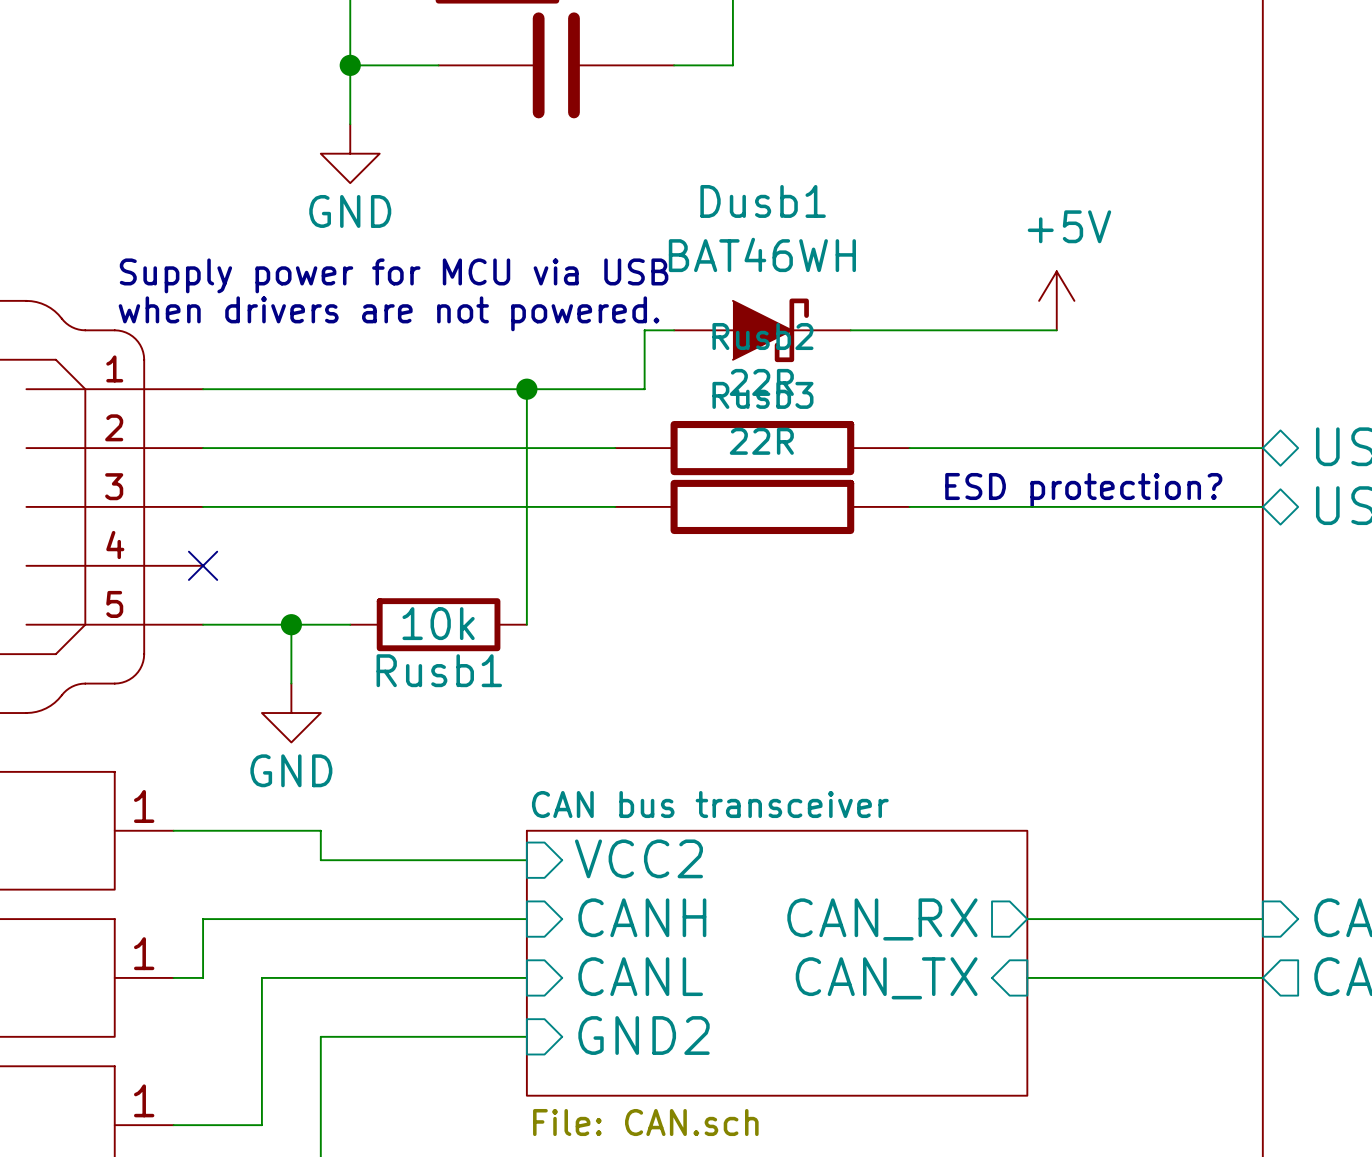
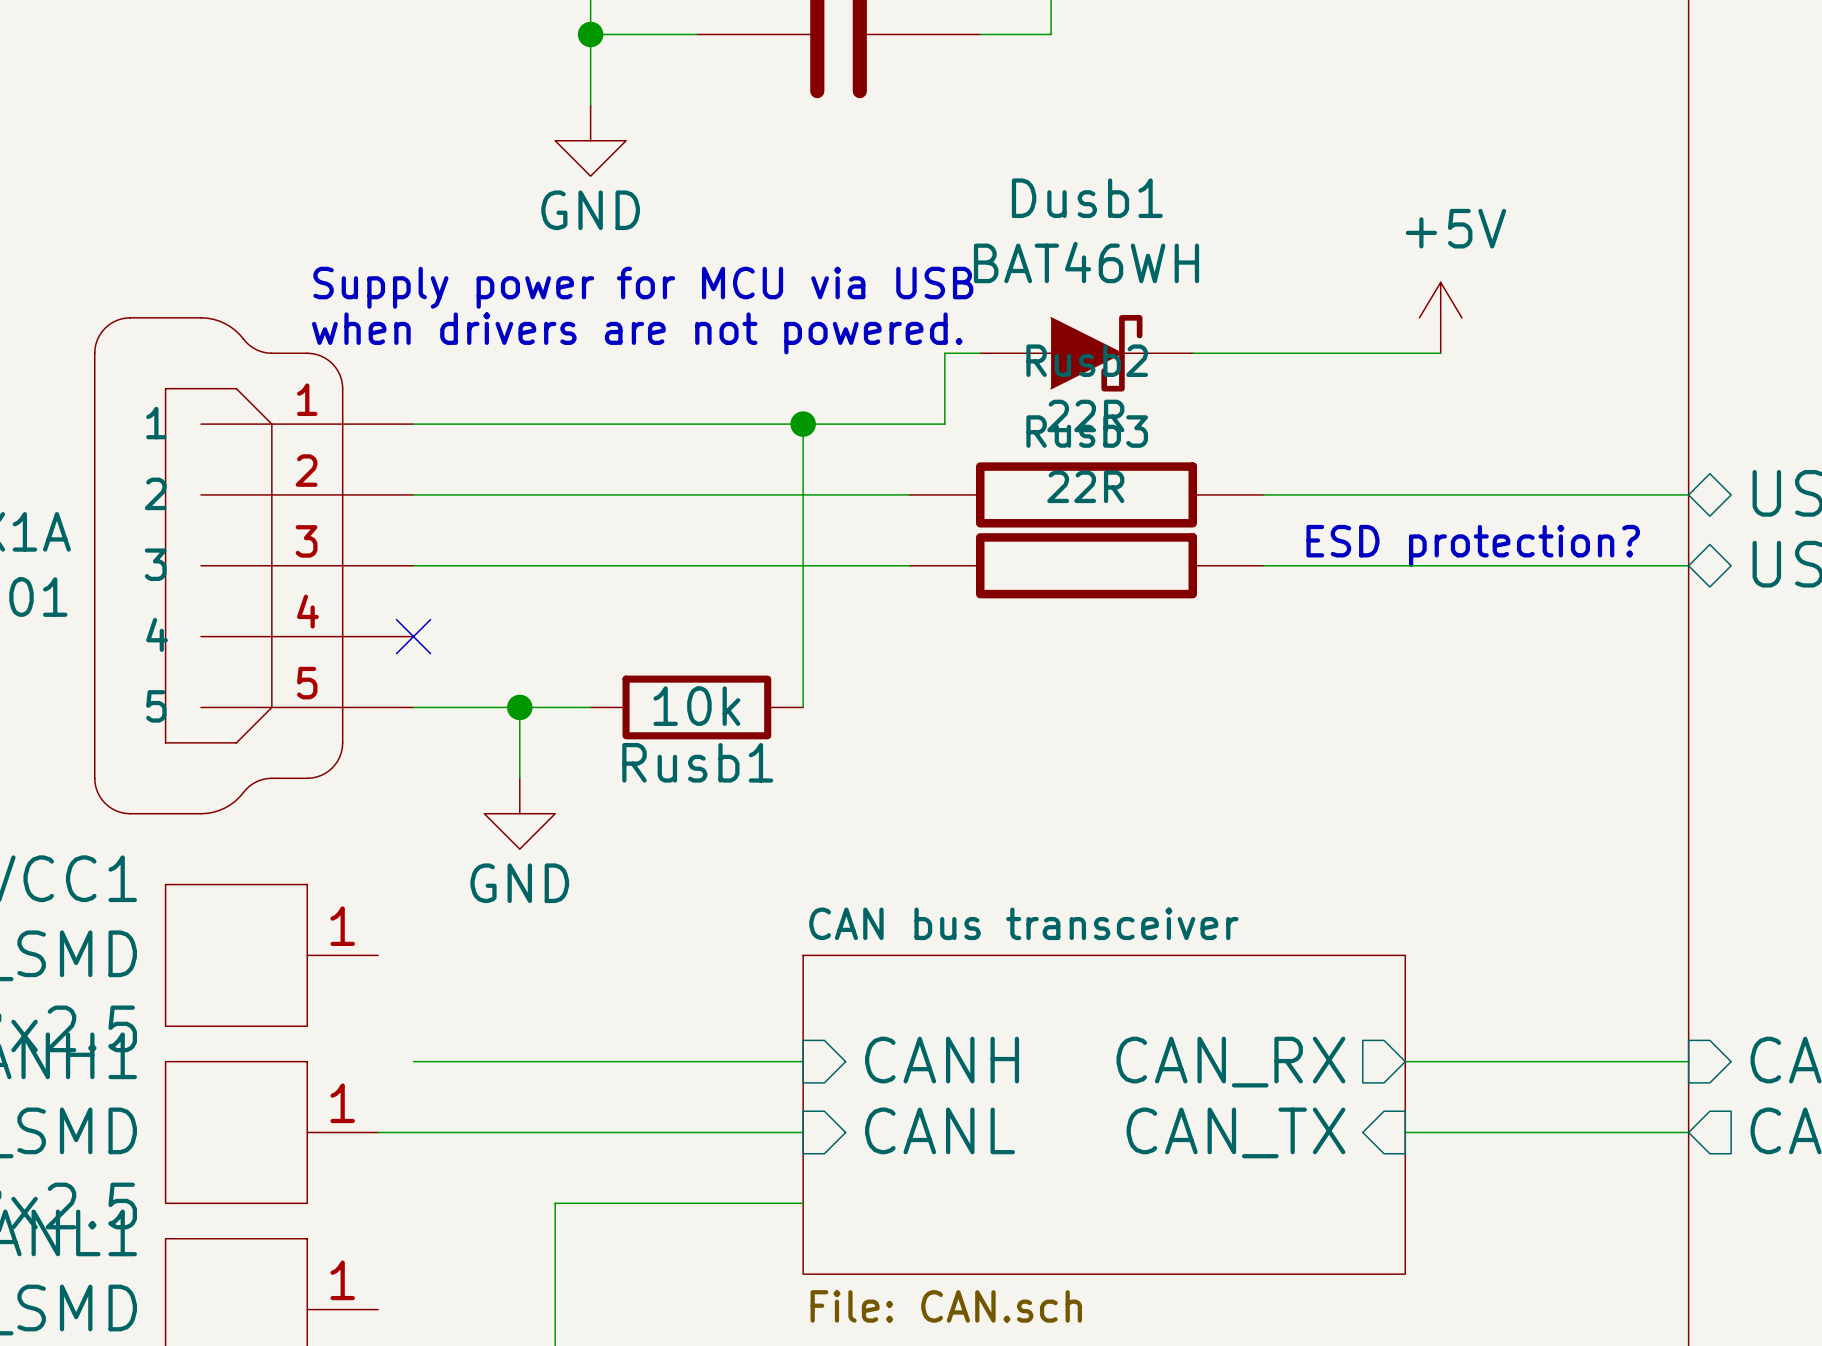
wire: (173, 830) (320, 830) (320, 860) (526, 860) -> none
sheet pin: VCC2 (638, 858) -> none
wire: (203, 919) (203, 977) -> (484, 1132) (413, 1132)
wire: (261, 977) (261, 1125) (173, 1125) -> none
sheet pin: GND2 (644, 1035) -> none

